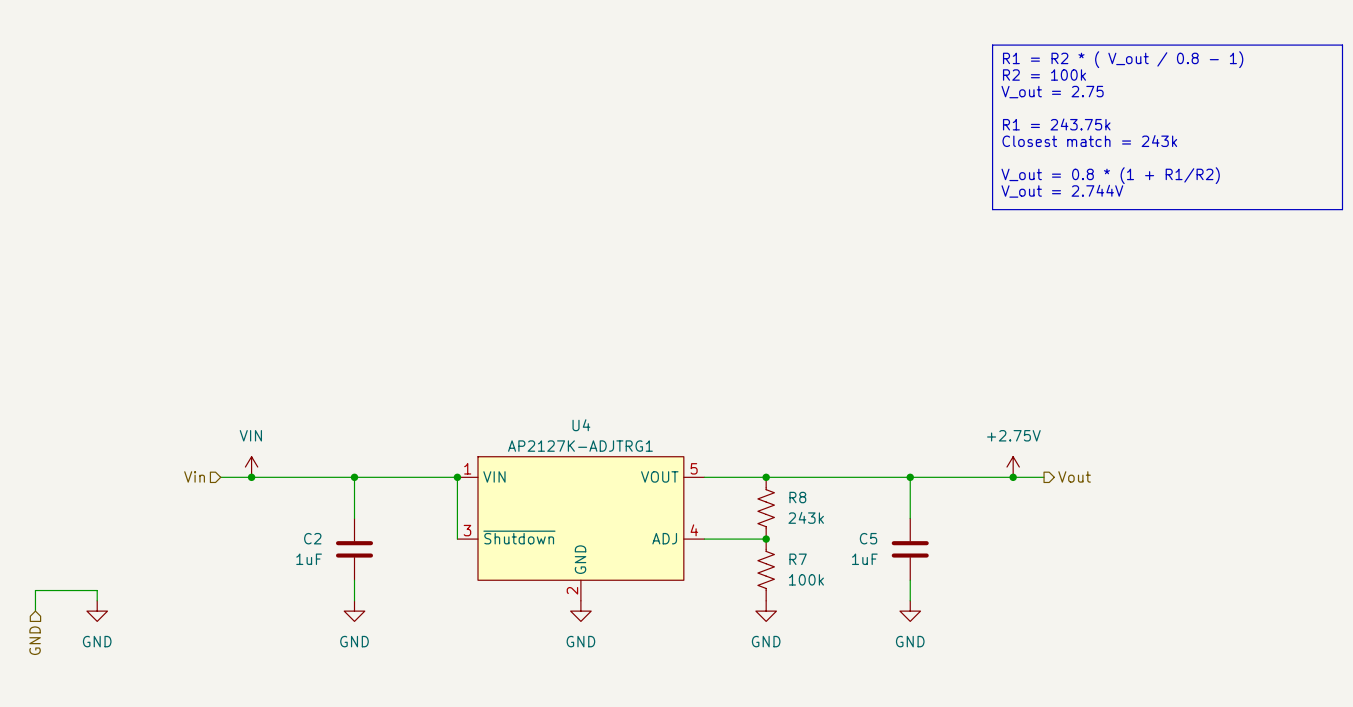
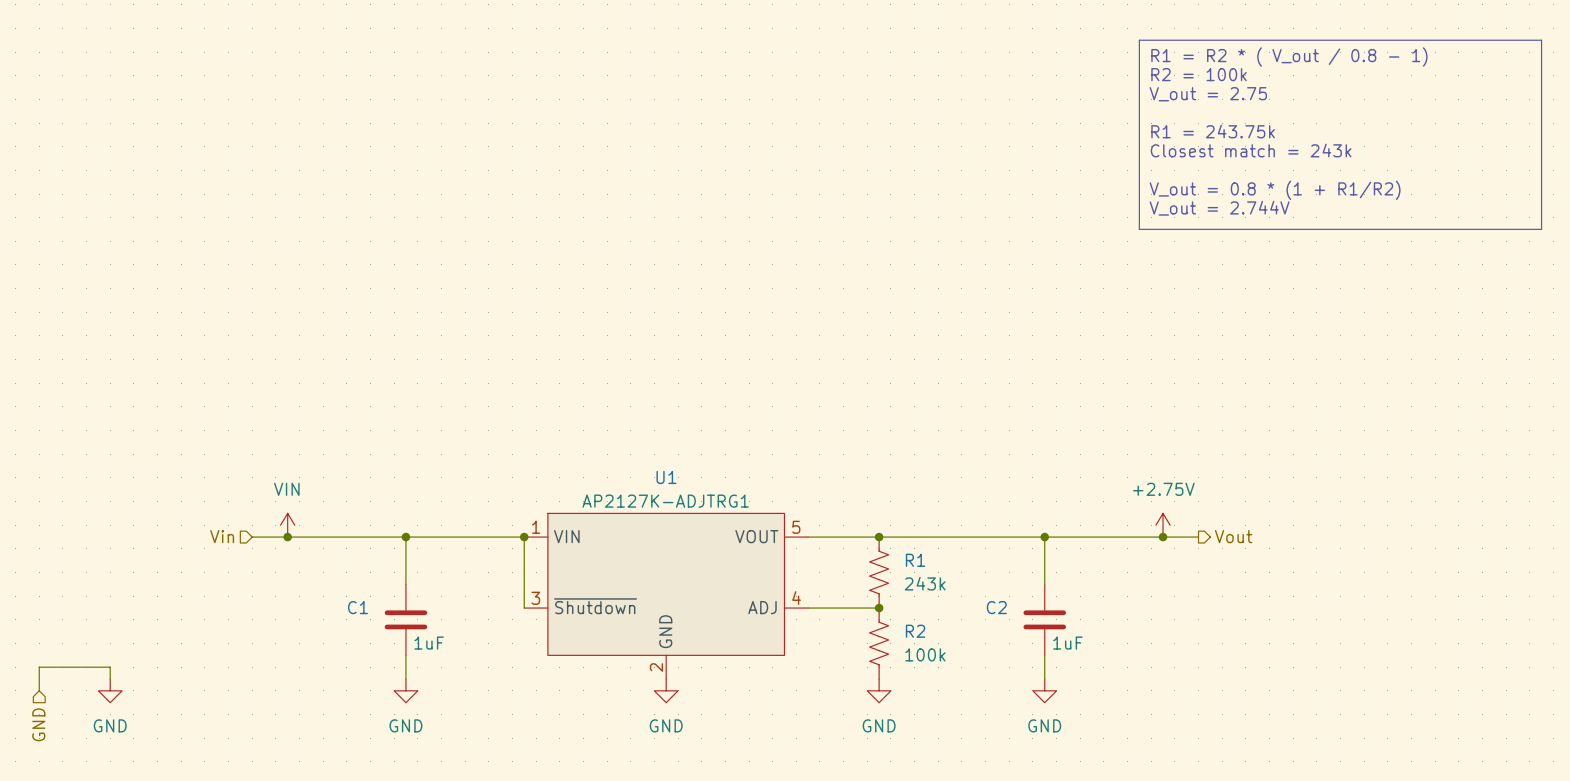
U4 name: U4 (581, 425) -> U1 (666, 477)
R8 name: R8 (797, 497) -> R1 (915, 560)
C2 name: C2 (312, 538) -> C1 (357, 607)
C5 name: C5 (868, 538) -> C2 (996, 607)
C2 value position: 1uF (309, 559) -> 1uF (429, 643)
R7 name: R7 (798, 559) -> R2 (915, 631)
C5 value position: 1uF (864, 559) -> 1uF (1067, 643)

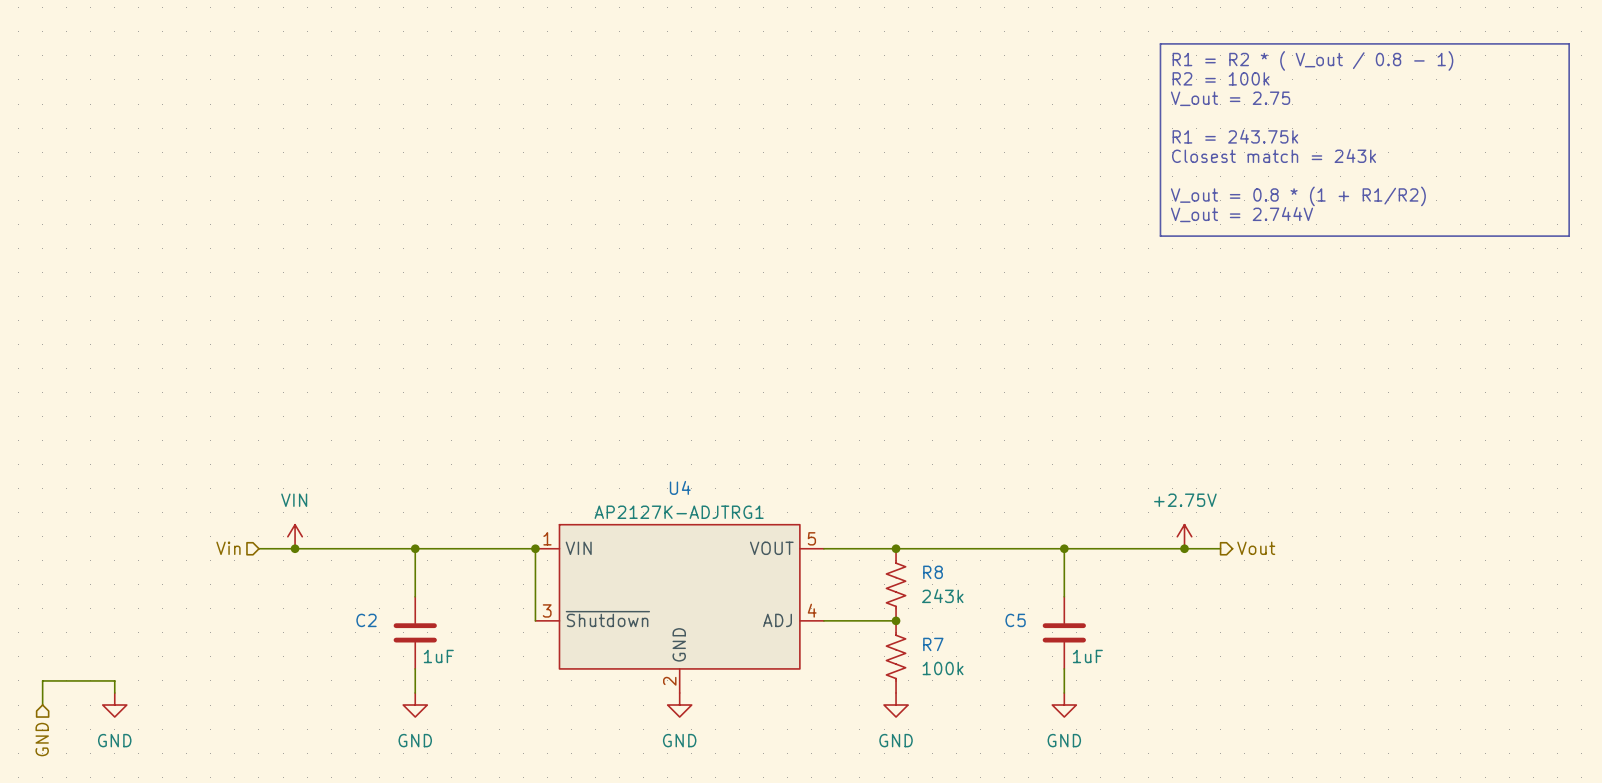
U1 name: U1 (666, 477) -> U4 (680, 487)
R1 name: R1 (915, 560) -> R8 (933, 572)
C1 name: C1 (357, 607) -> C2 (366, 620)
C2 name: C2 (996, 607) -> C5 (1015, 620)
R2 name: R2 (915, 631) -> R7 (933, 644)

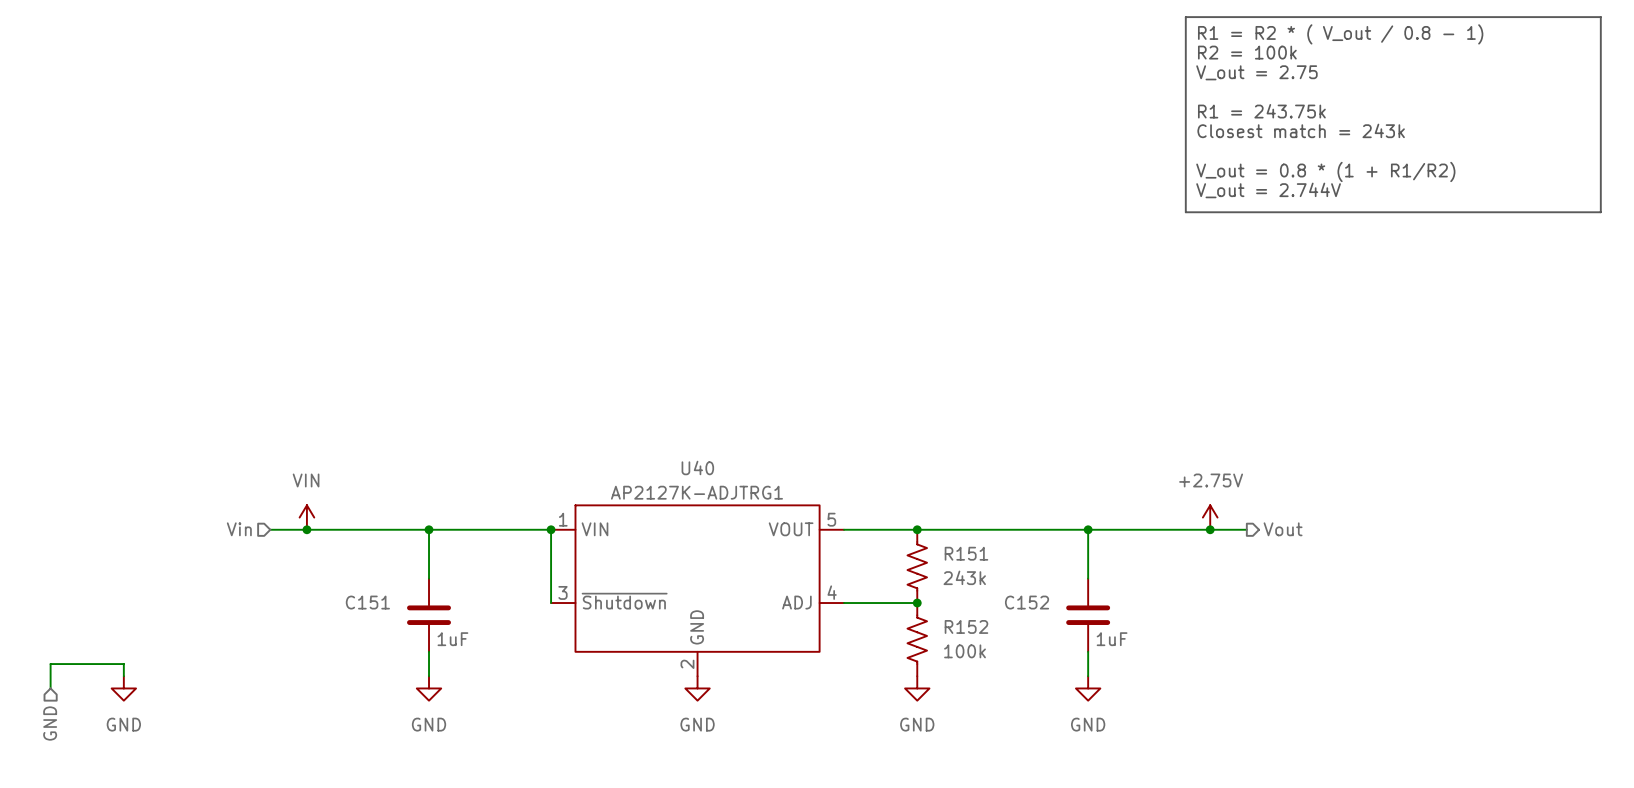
U4 name: U4 (680, 487) -> U40 (697, 467)
R8 name: R8 (933, 572) -> R151 (966, 553)
C2 name: C2 (366, 620) -> C151 (367, 602)
C5 name: C5 (1015, 620) -> C152 (1027, 602)
R7 name: R7 (933, 644) -> R152 (966, 626)

